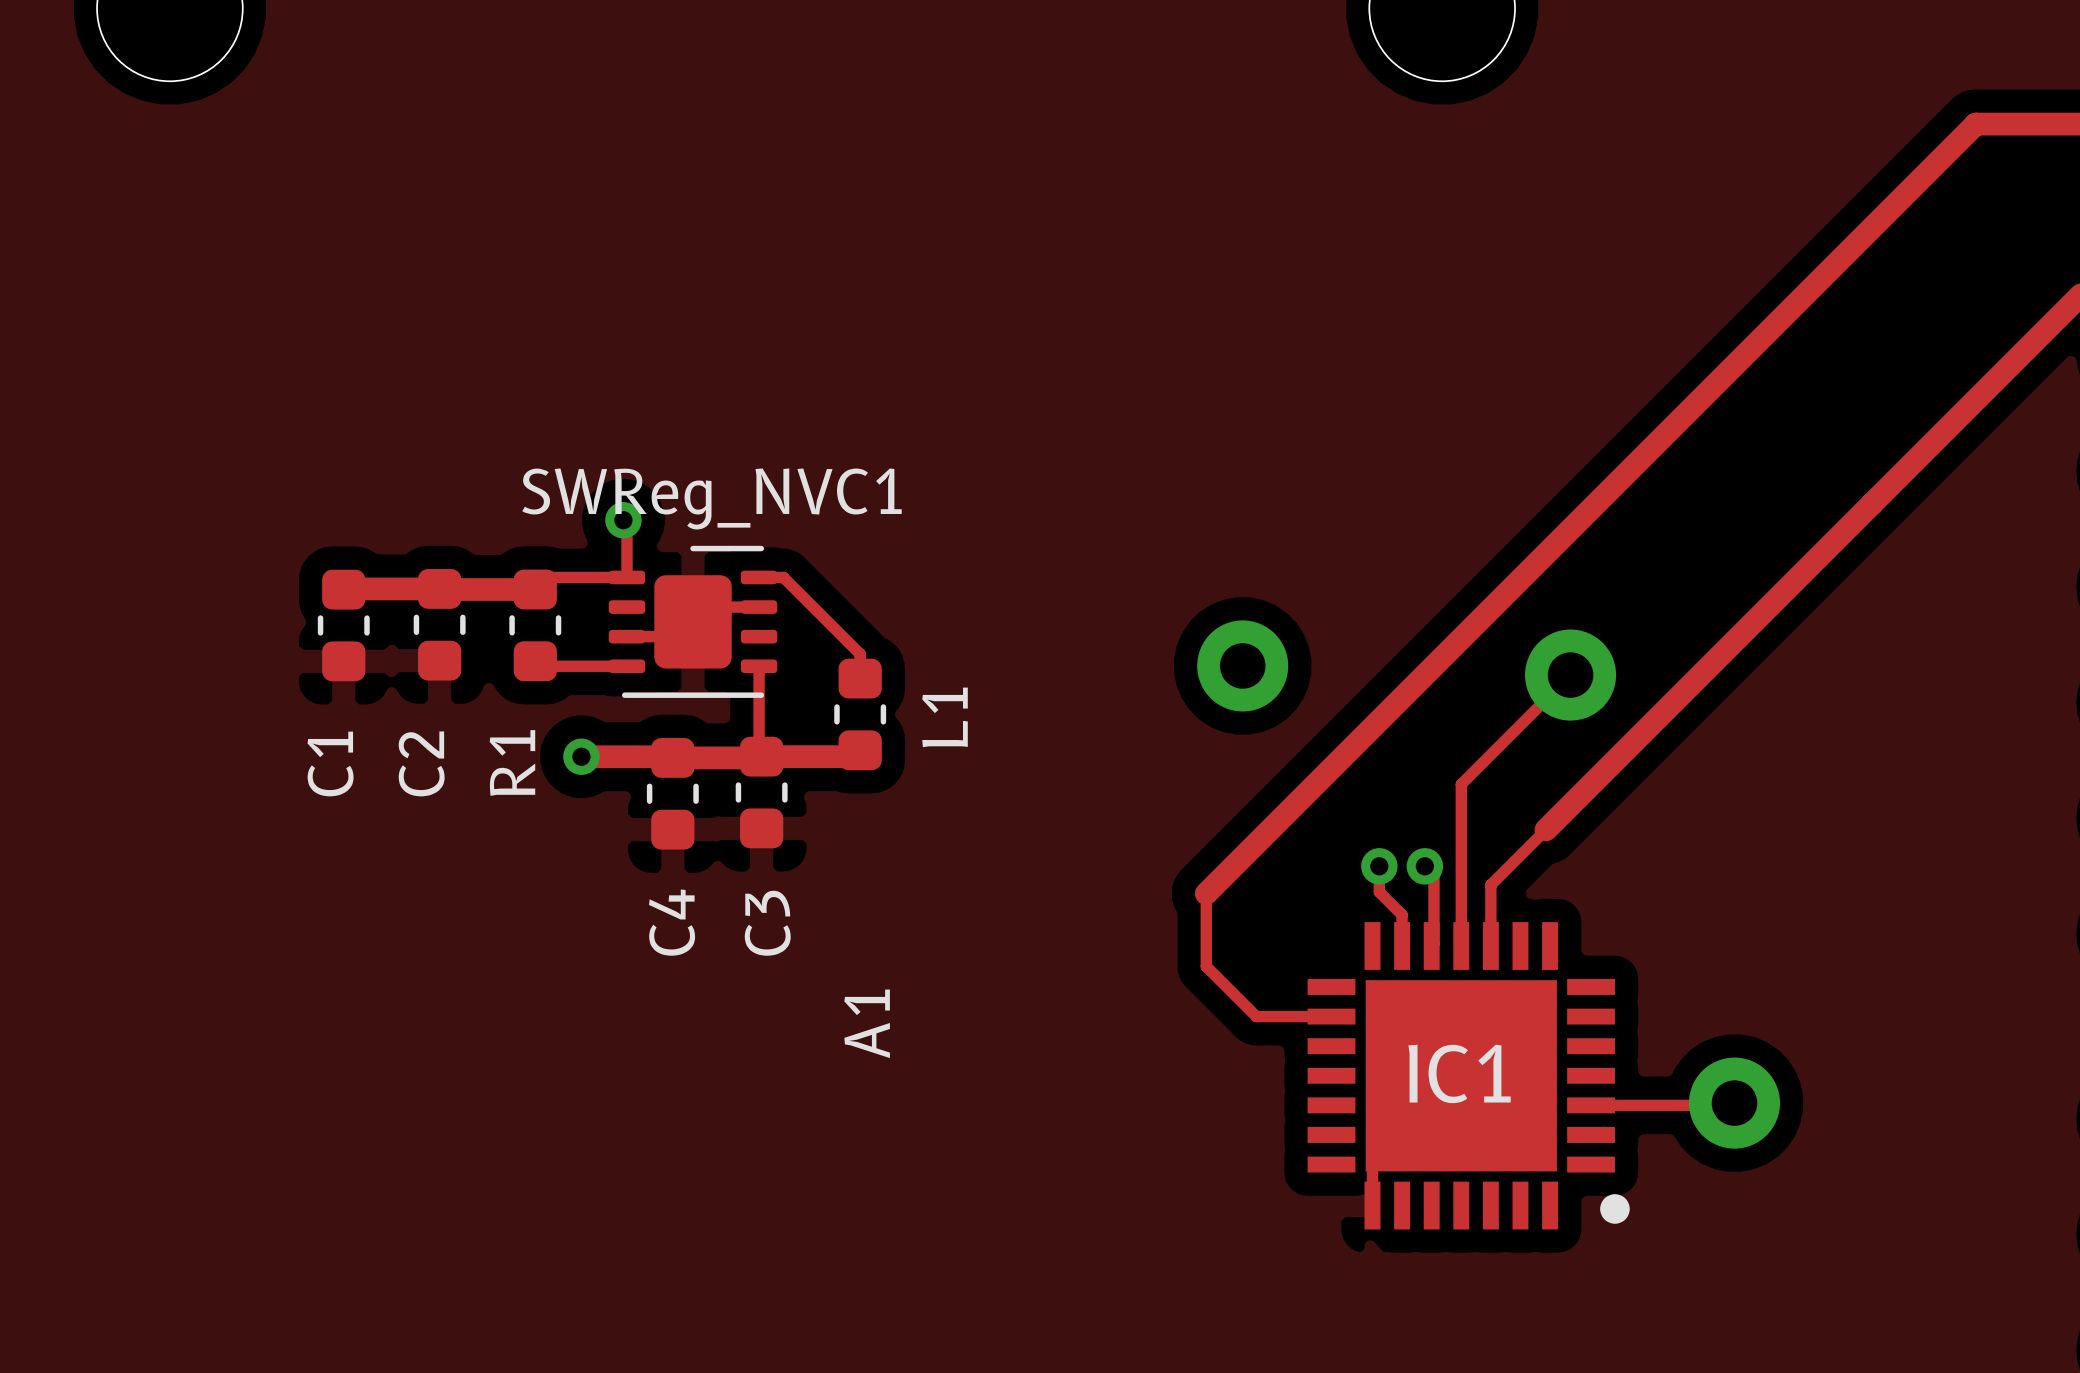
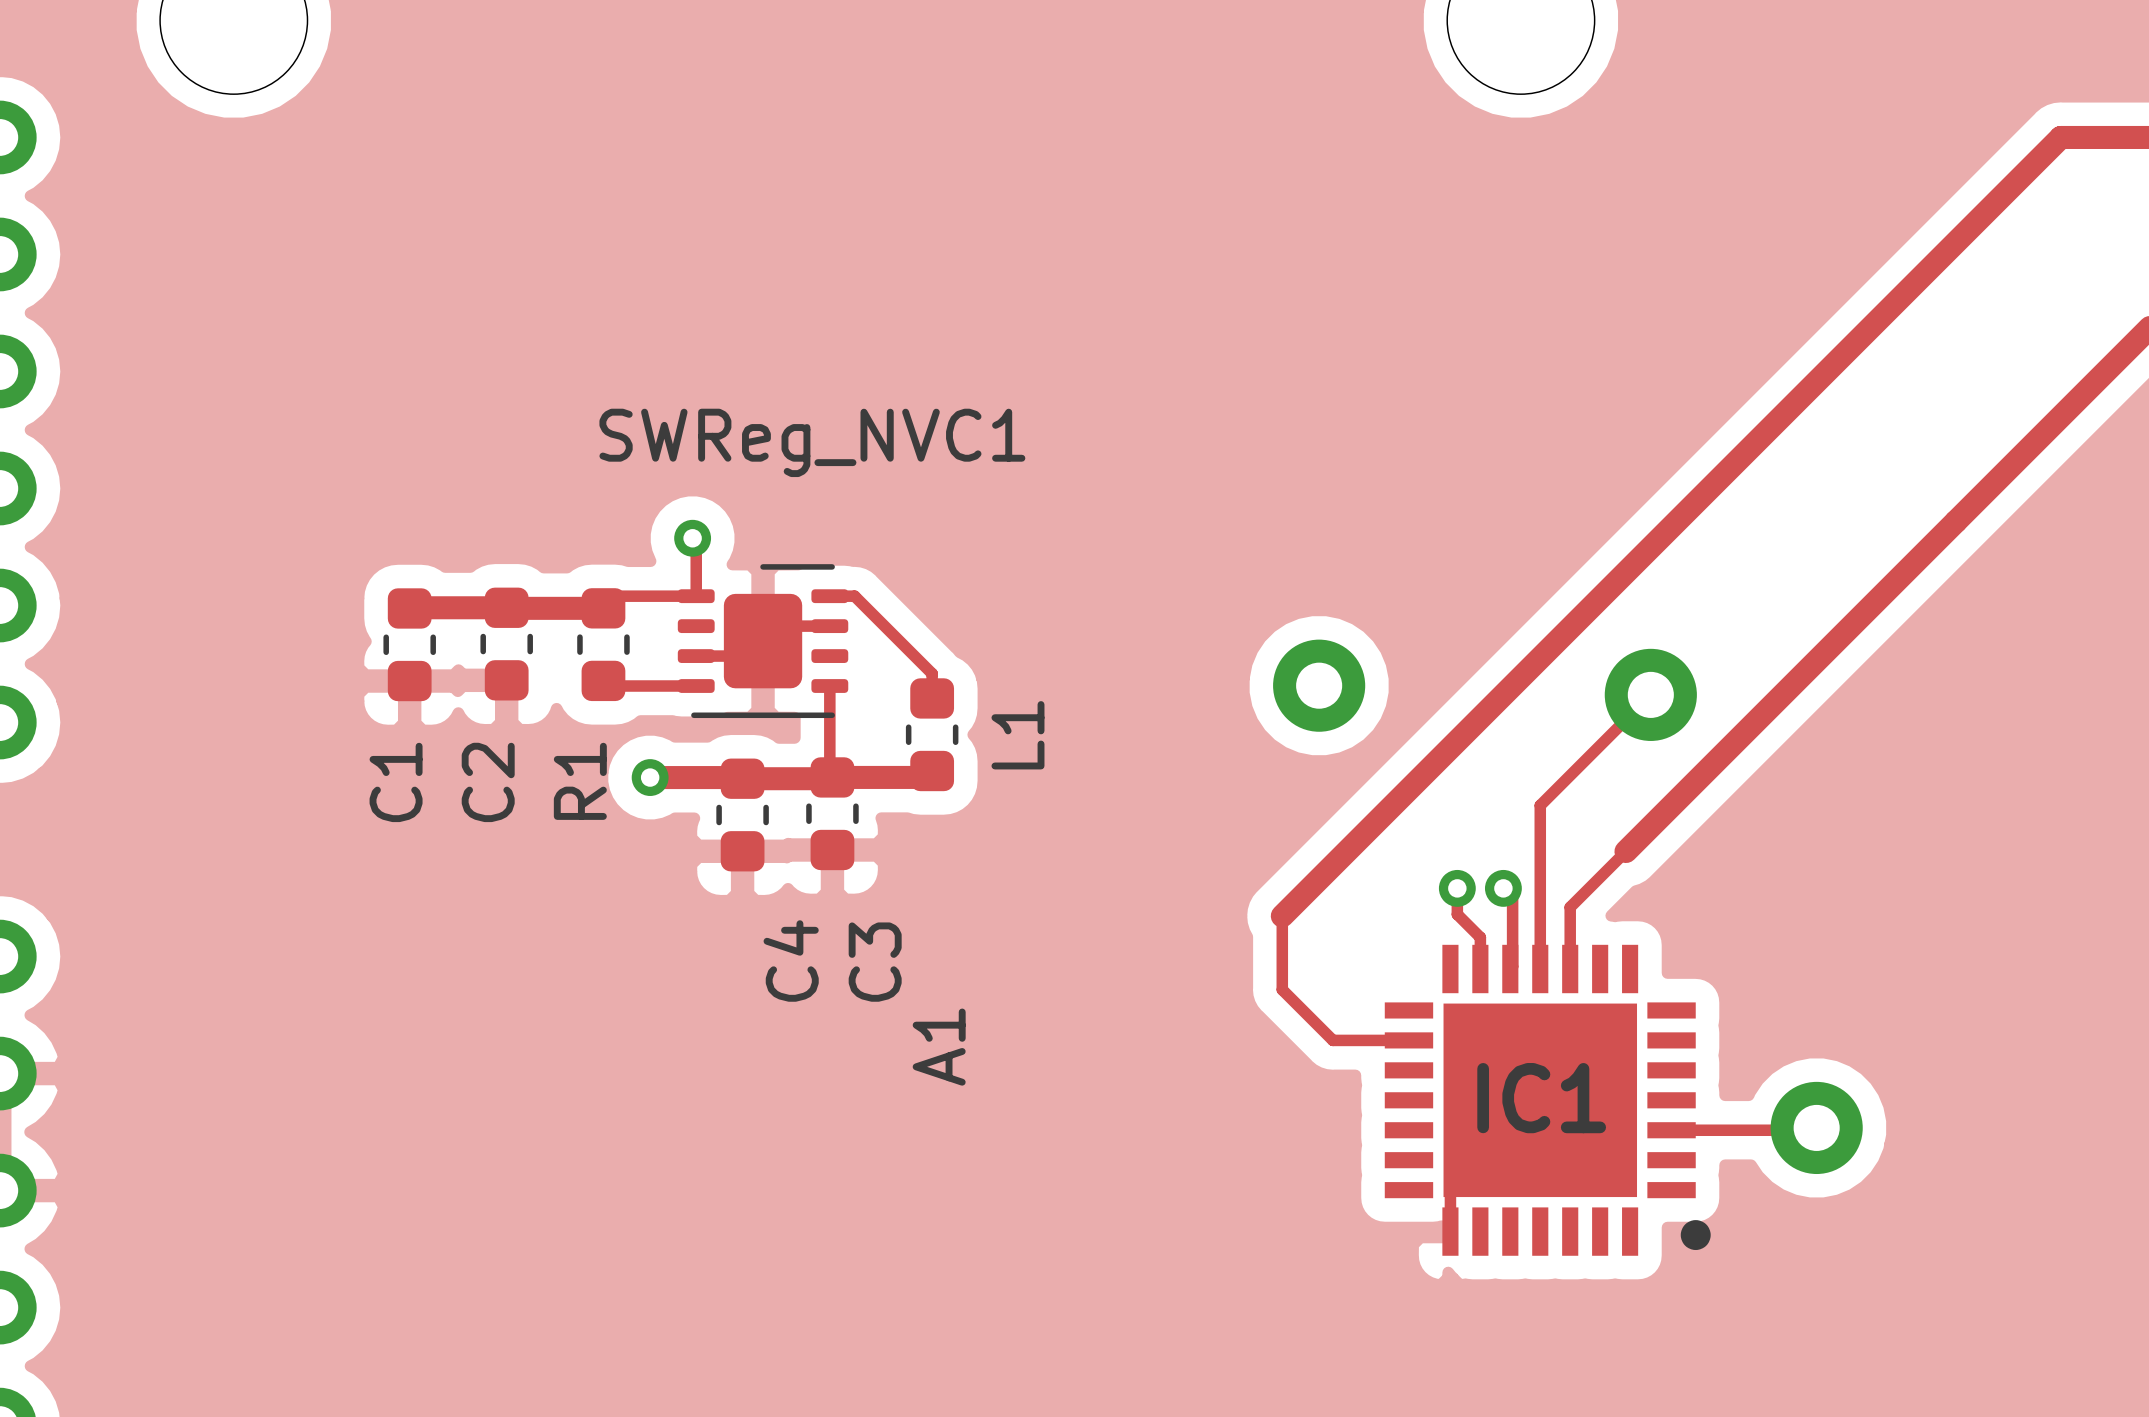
SWReg_NVC1 name position: SWReg_NVC1 (711, 498) -> SWReg_NVC1 (812, 442)
C4 name position: C4 (672, 922) -> C4 (791, 961)
C3 name position: C3 (767, 923) -> C3 (875, 962)

